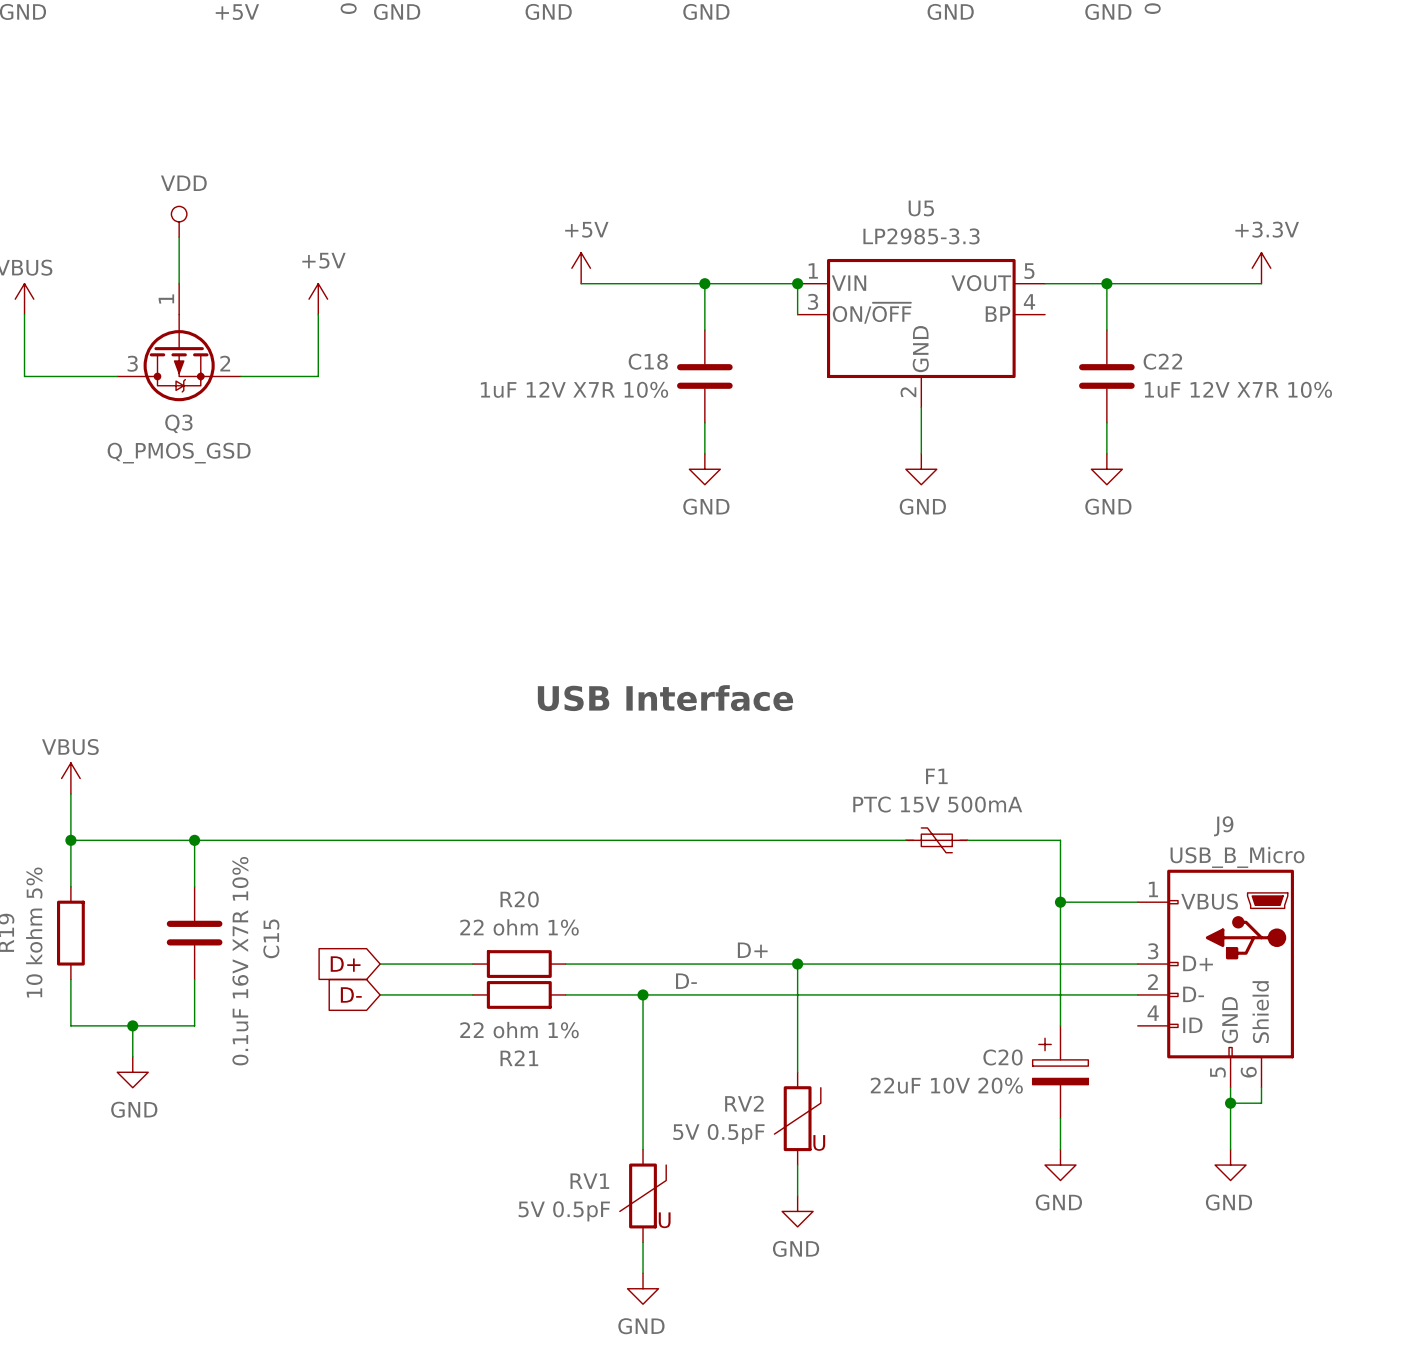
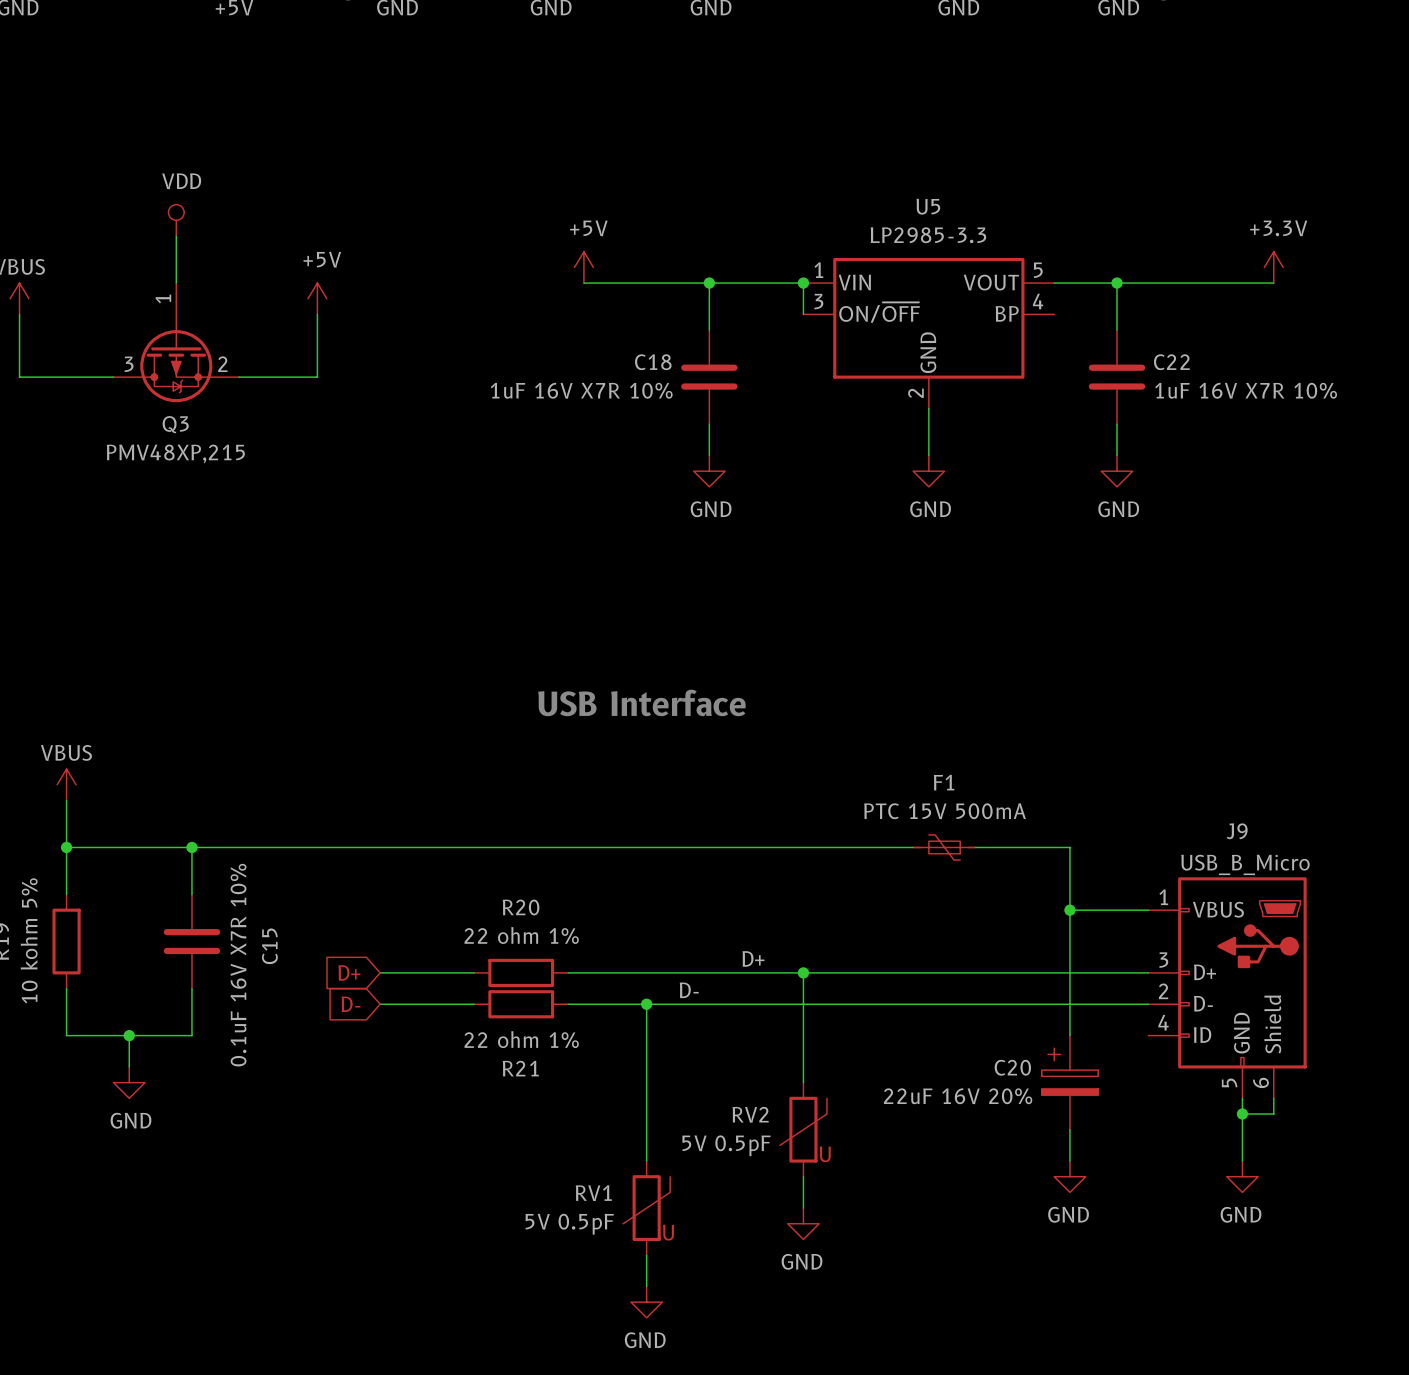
C18 value: 1uF 12V X7R 10% (574, 389) -> 1uF 16V X7R 10% (581, 390)
C22 value: 1uF 12V X7R 10% (1238, 389) -> 1uF 16V X7R 10% (1246, 390)
Q3 value: Q_PMOS_GSD (179, 453) -> PMV48XP,215 (175, 453)
C20 value: 22uF 10V 20% (946, 1085) -> 22uF 16V 20% (958, 1096)

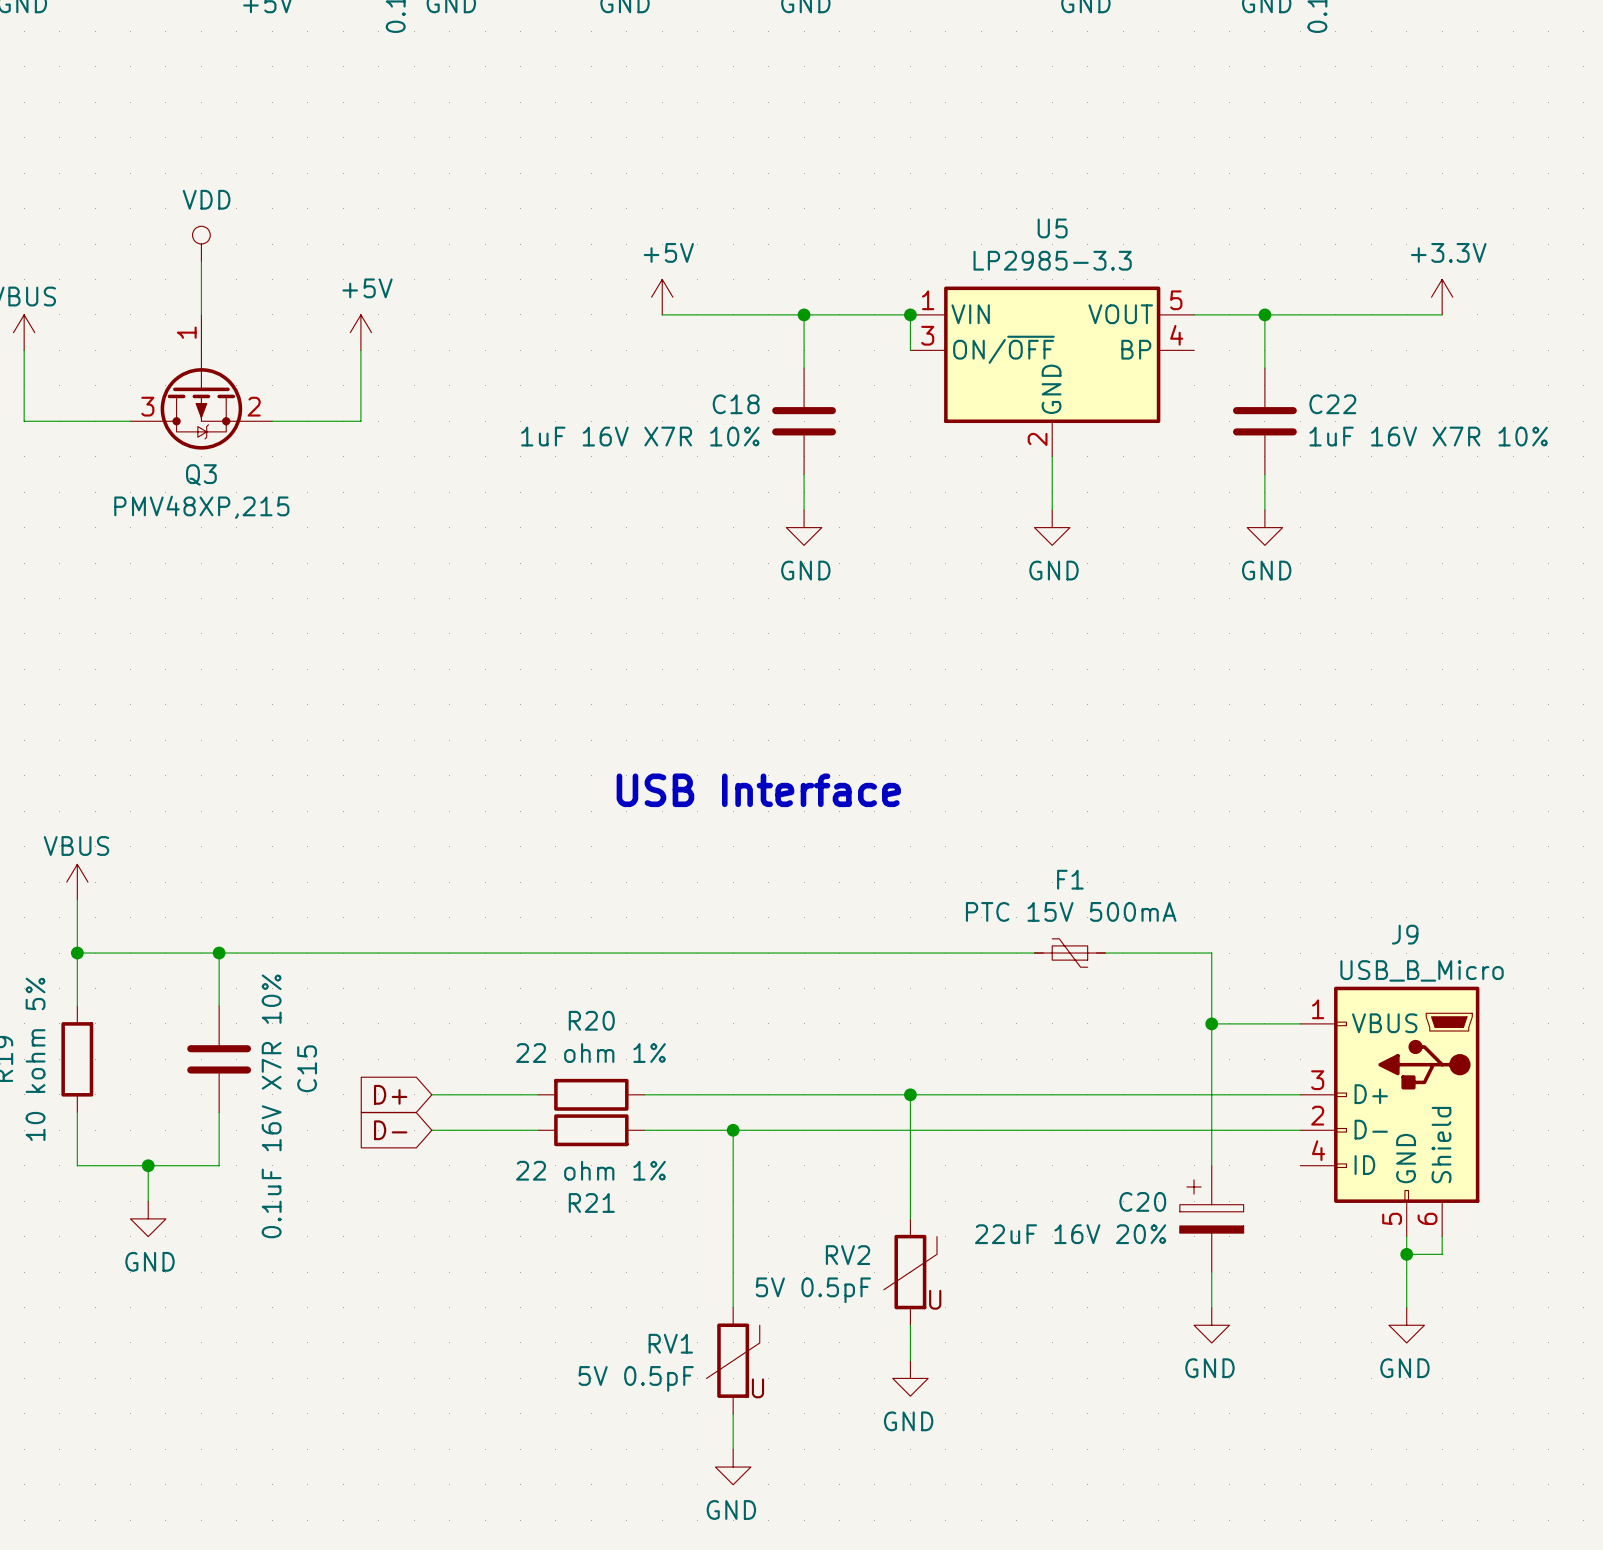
label: D+ (753, 958) -> none
label: D- (689, 990) -> none

